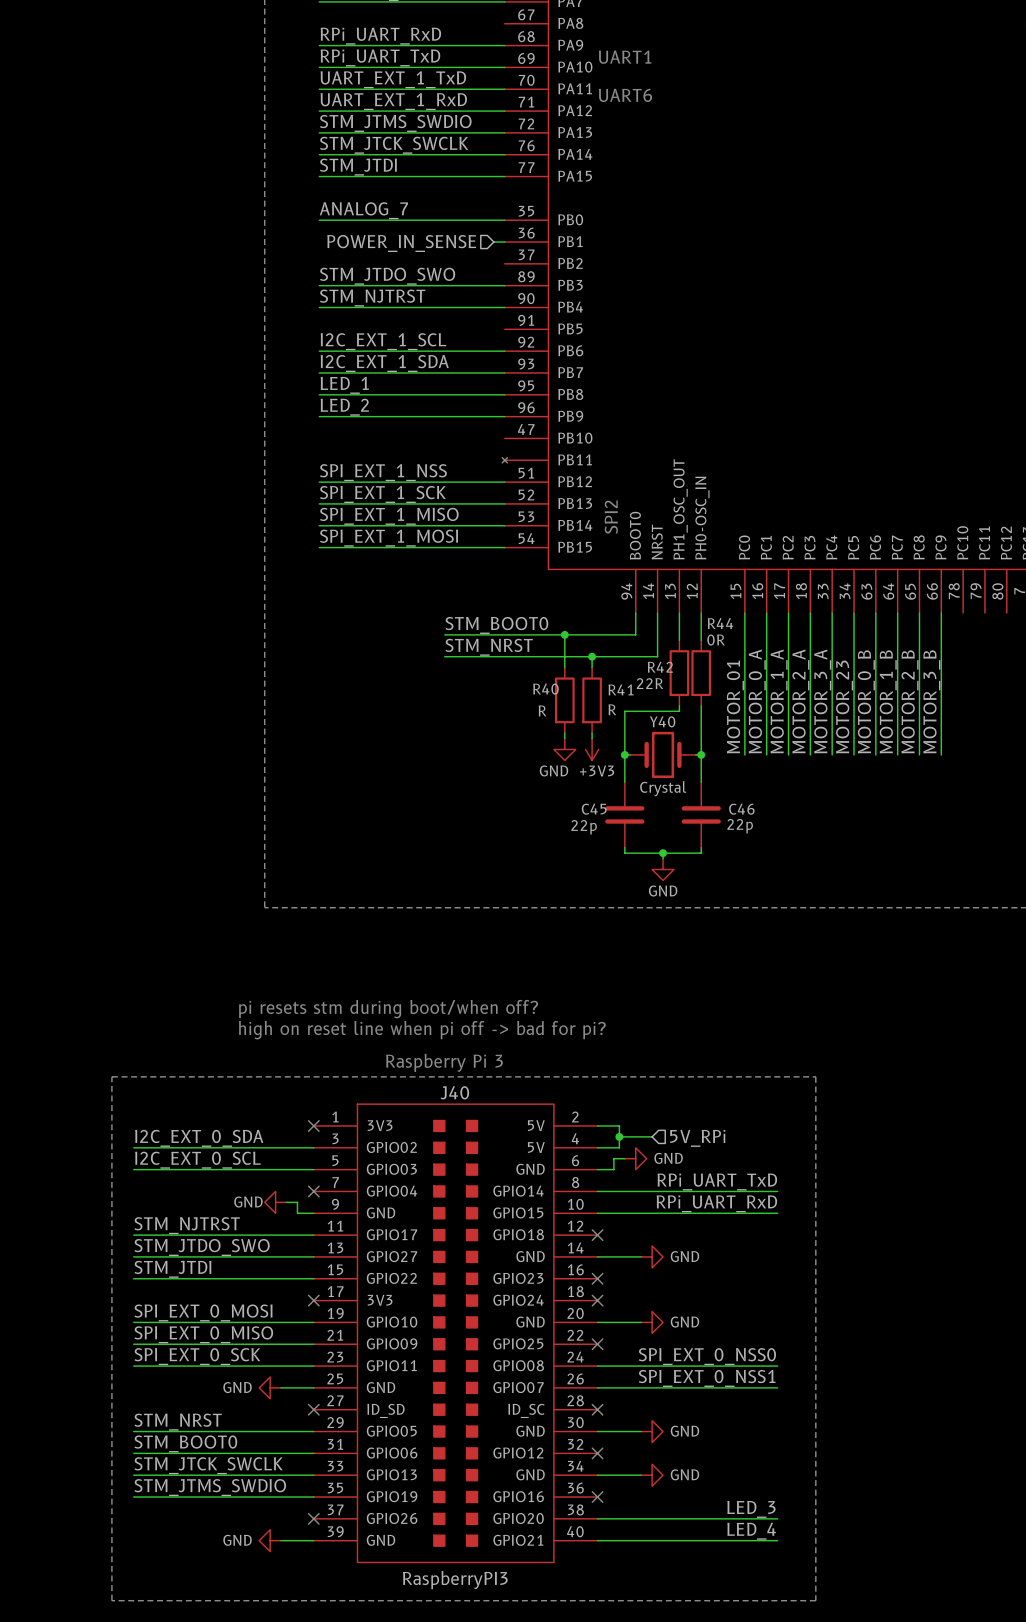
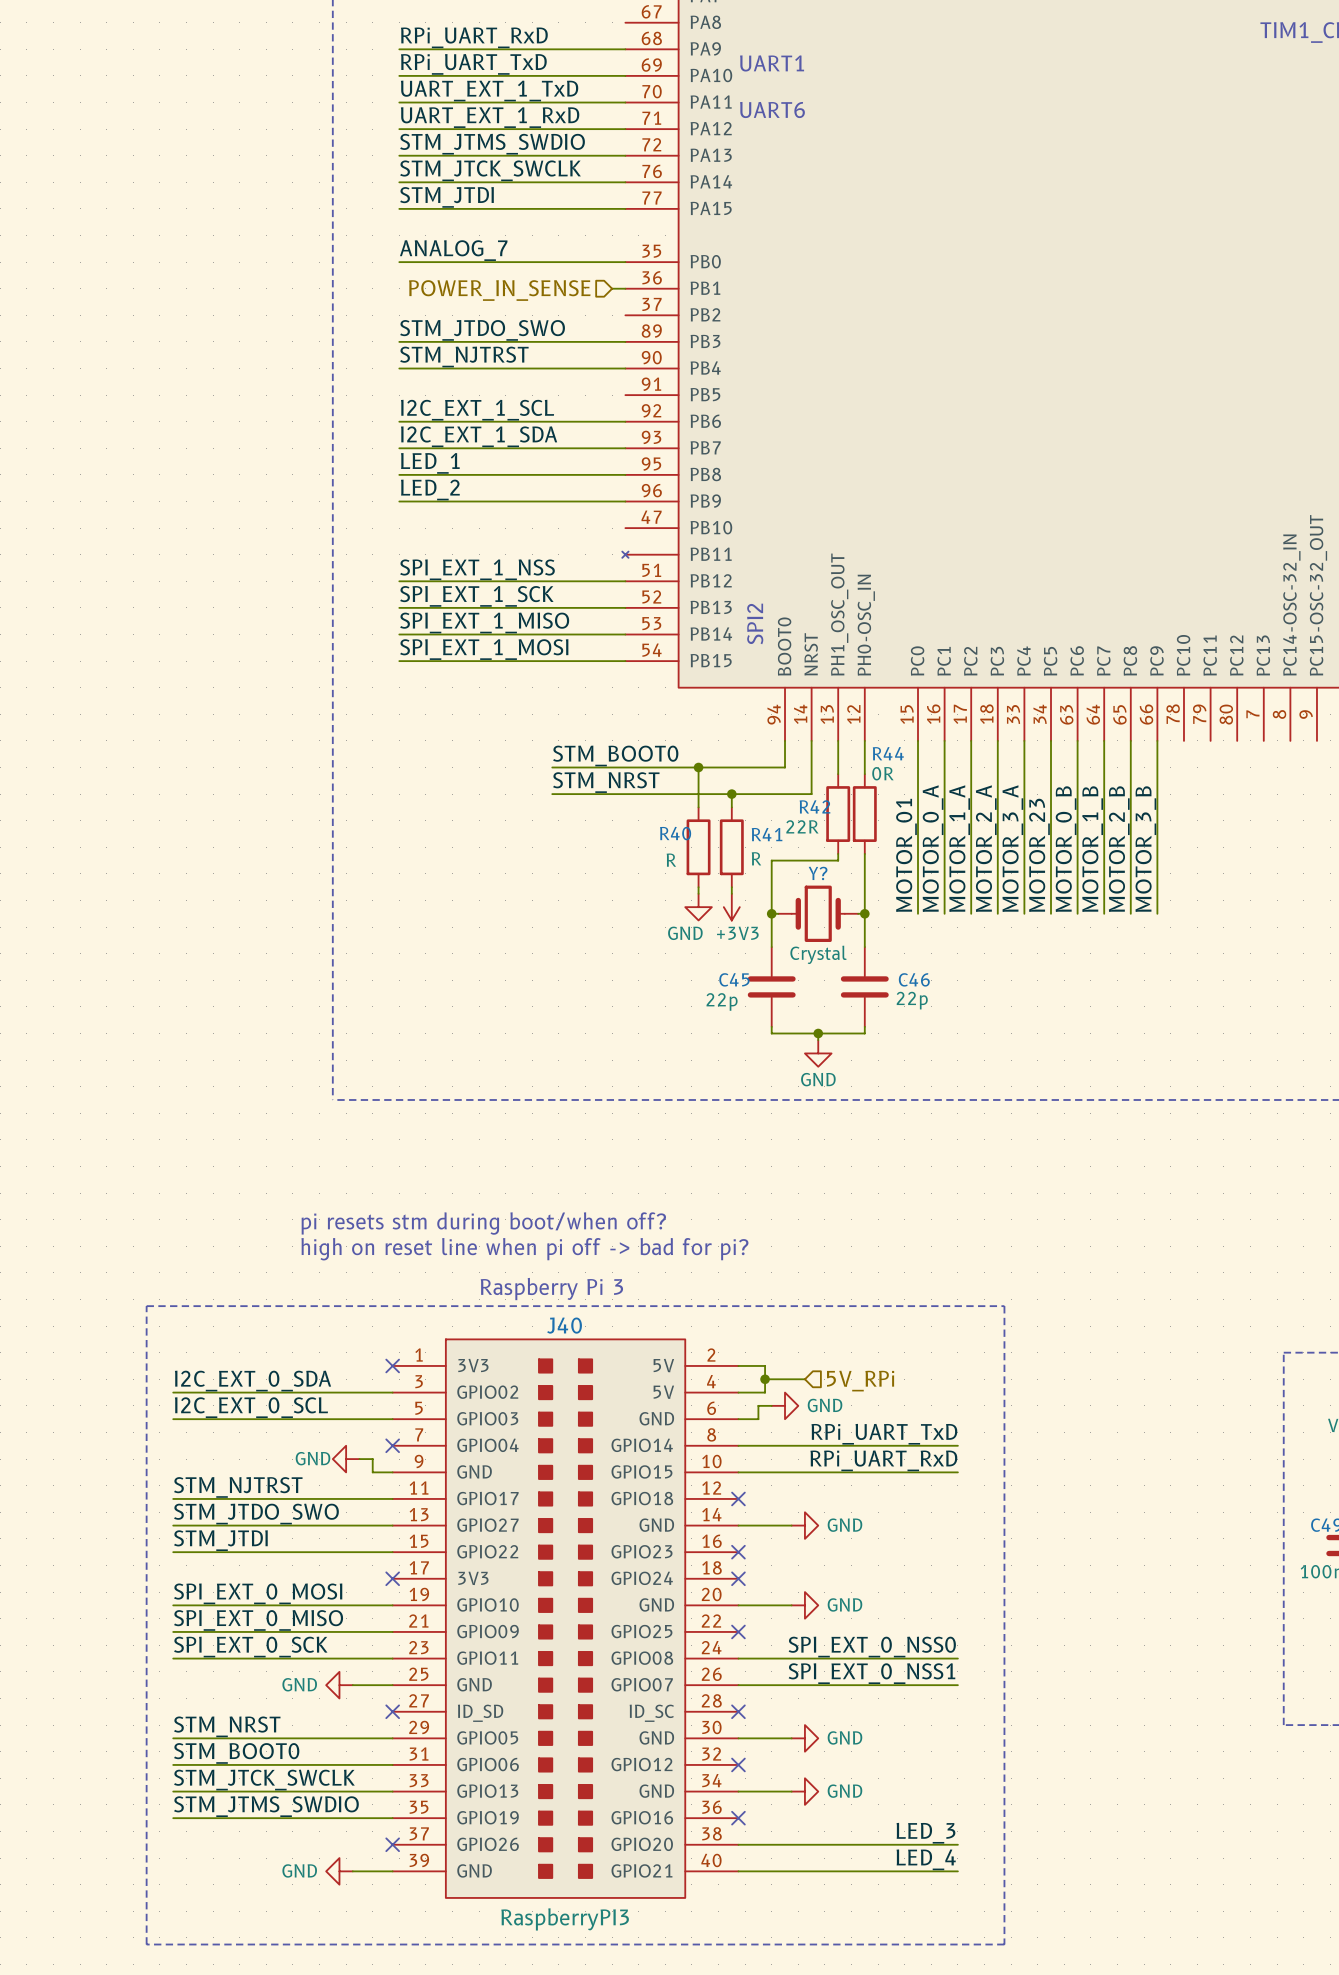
Y40 name: Y40 (662, 721) -> Y? (818, 873)

